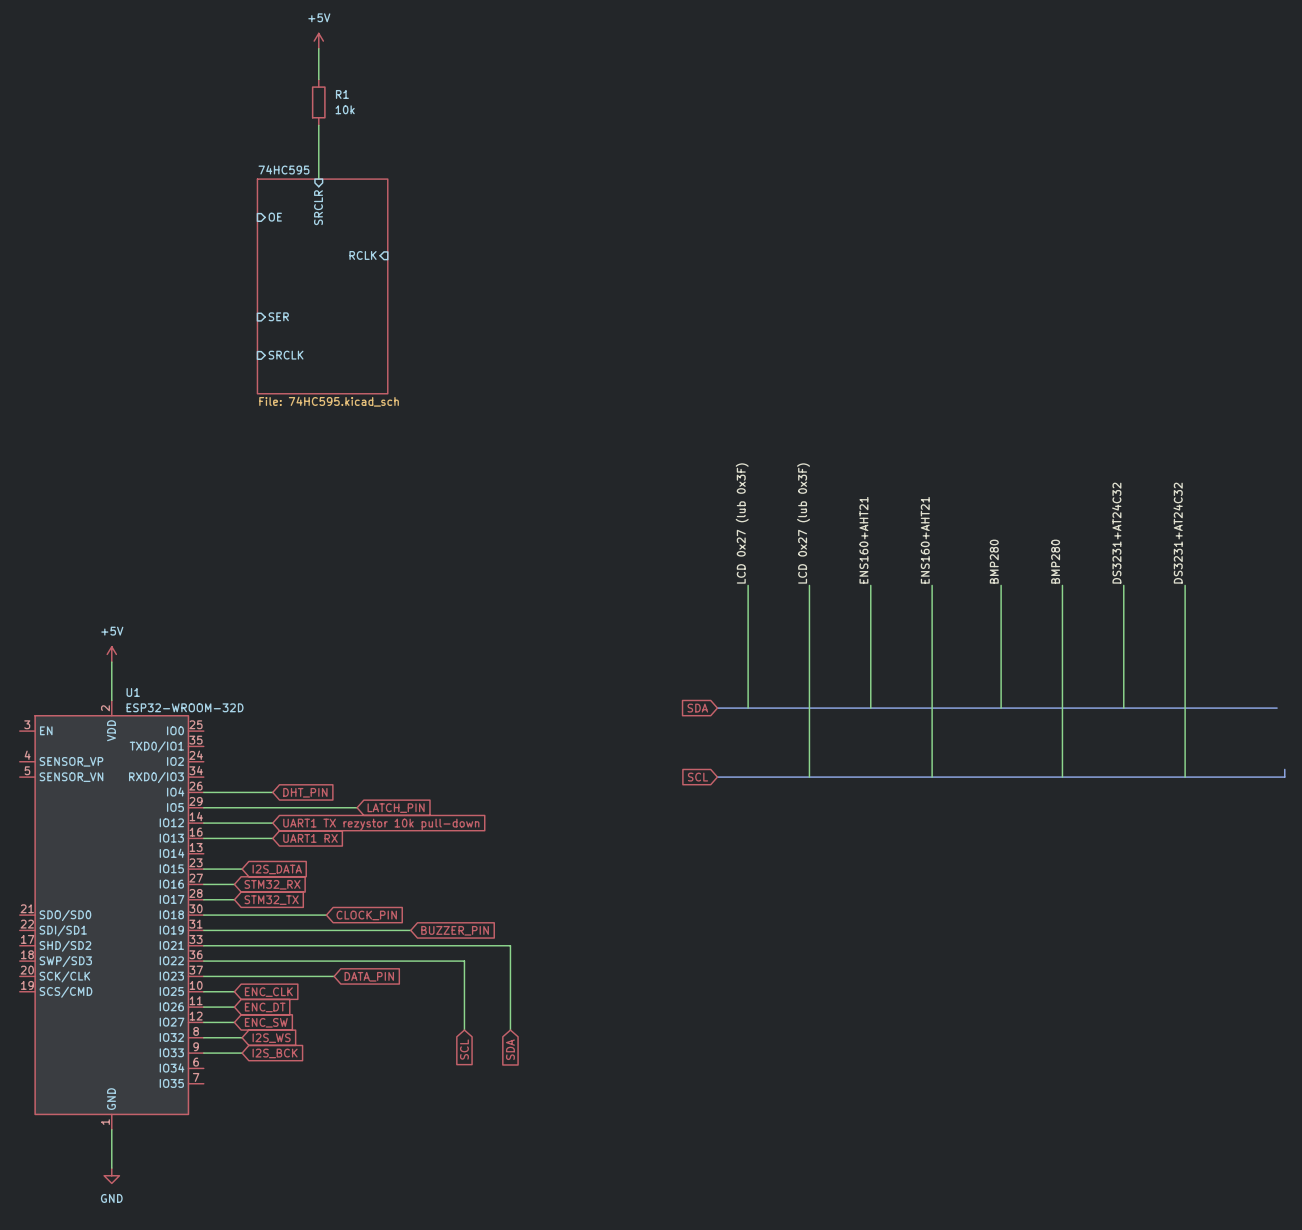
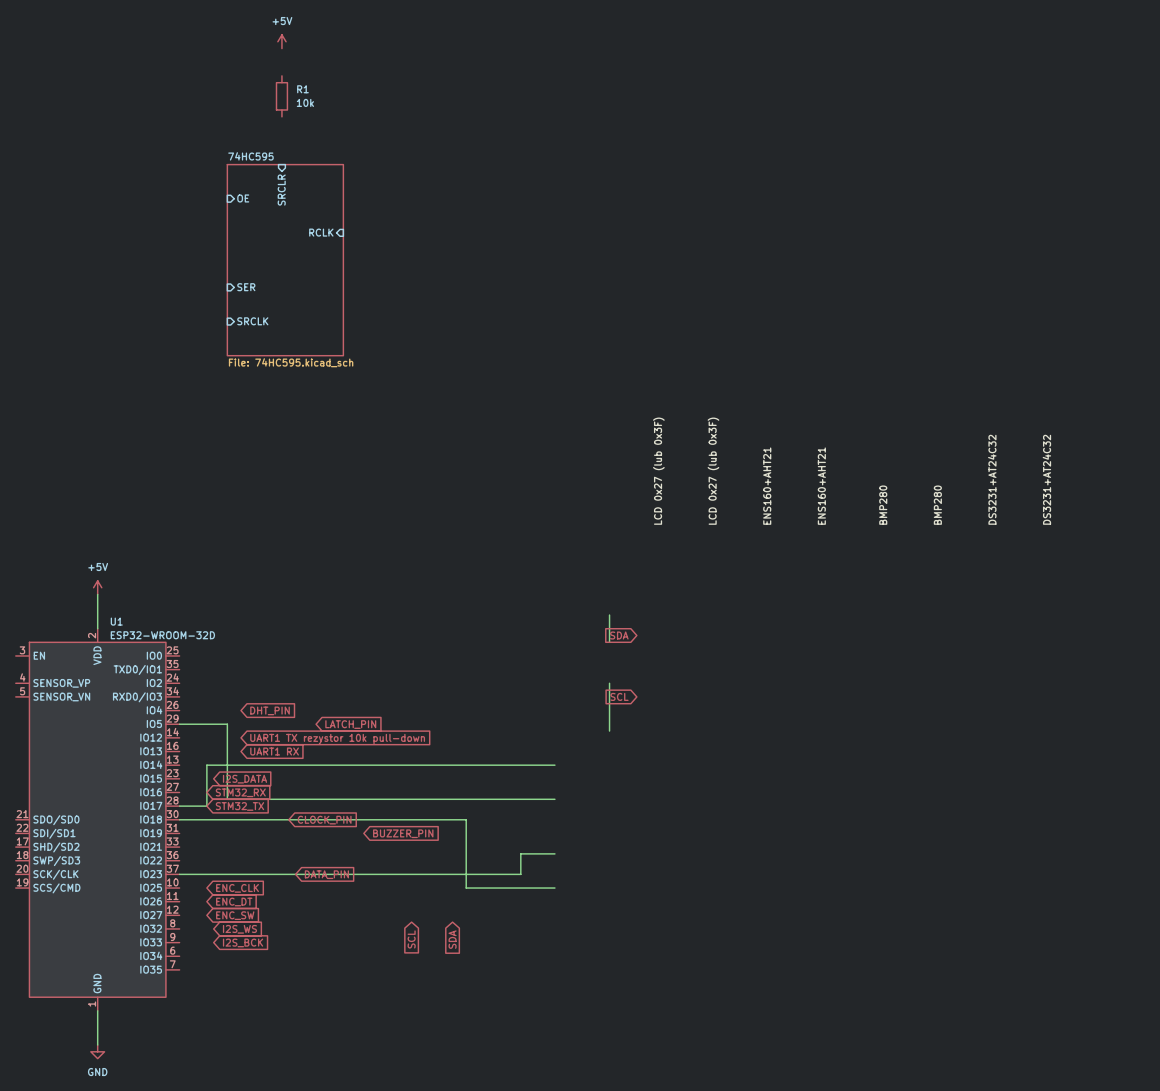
wire: (318, 48) (318, 79) -> none
wire: (318, 125) (318, 179) -> none
wire: (748, 585) (748, 708) -> none
wire: (809, 585) (809, 777) -> none
wire: (870, 585) (870, 708) -> none
wire: (932, 585) (932, 777) -> none
wire: (1001, 585) (1001, 708) -> none
wire: (1062, 585) (1062, 777) -> none
wire: (1123, 585) (1123, 708) -> none
wire: (1185, 585) (1185, 777) -> none
wire: none -> (609, 615) (609, 642)
bus: (717, 708) (1277, 708) -> none
wire: none -> (609, 683) (609, 731)
bus: (1284, 769) (1284, 777) (717, 777) -> none
wire: (203, 792) (272, 792) -> none
wire: (257, 807) (357, 807) -> (227, 724) (227, 799) (554, 799)
wire: (203, 823) (272, 823) -> none
wire: (203, 838) (272, 838) -> none
wire: none -> (554, 765) (206, 765) (206, 806)
wire: (203, 869) (242, 869) -> none
wire: (203, 884) (234, 884) -> none
wire: none -> (288, 819) (466, 819) (466, 888) (554, 888)
wire: (203, 930) (410, 930) -> none
wire: (203, 945) (510, 945) (510, 1030) -> none
wire: none -> (554, 853) (520, 853) (520, 874) (295, 874)
wire: (203, 961) (464, 961) (464, 1030) -> none
wire: (203, 991) (234, 991) -> none
wire: (203, 1007) (234, 1007) -> none
wire: (203, 1022) (234, 1022) -> none
wire: (203, 1037) (242, 1037) -> none
wire: (203, 1053) (242, 1053) -> none

